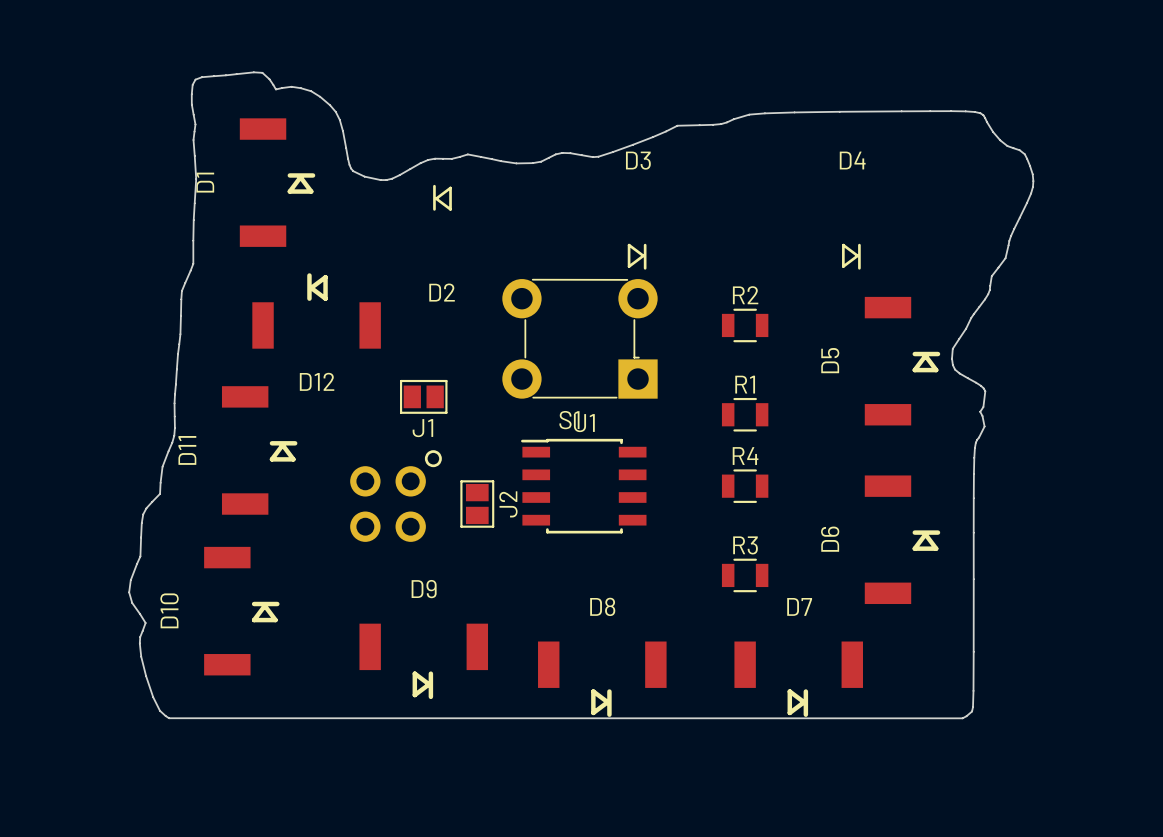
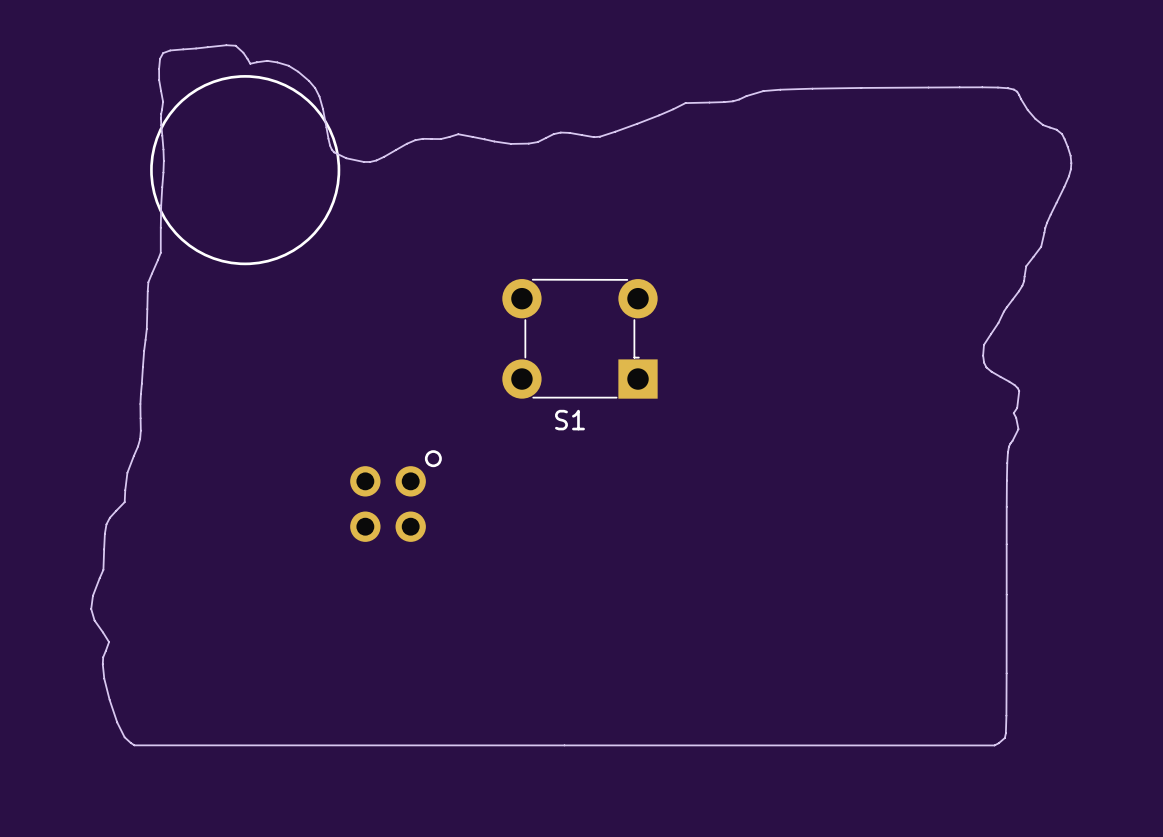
board edge: (253, 72) (262, 72) (275, 89) (291, 86) (300, 88) (320, 96) (330, 105) (339, 119) (351, 168) (364, 176) (380, 180) (392, 178) (428, 159) (451, 158) (467, 154) (516, 163) (541, 161) (562, 152) (598, 156) (653, 137) (677, 125) (721, 124) (749, 114) (951, 111) (975, 112) (983, 115) (1000, 140) (1024, 154) (1033, 181) (1031, 193) (1011, 235) (1005, 258) (991, 276) (988, 294) (952, 348) (952, 358) (955, 369) (981, 385) (985, 391) (983, 407) (980, 411) (984, 426) (975, 442) (974, 457) (972, 711) (962, 718) (169, 718) (165, 716) (159, 710) (153, 697) (146, 676) (139, 643) (145, 622) (132, 603) (129, 592) (130, 580) (140, 556) (143, 514) (160, 493) (162, 466) (174, 435) (181, 291) (193, 263) (196, 179) (193, 139) (195, 124) (191, 104) (192, 84) (195, 79) (202, 77) (253, 72) -> (226, 45) (170, 50) (163, 53) (160, 58) (159, 80) (163, 101) (160, 118) (163, 160) (160, 252) (148, 282) (146, 329) (140, 394) (140, 439) (127, 472) (124, 502) (109, 517) (106, 524) (103, 569) (92, 595) (91, 608) (94, 620) (109, 642) (102, 664) (109, 699) (117, 722) (124, 737) (130, 742) (134, 745) (994, 745) (1004, 738) (1007, 463) (1008, 446) (1018, 429) (1013, 413) (1017, 408) (1019, 390) (1014, 385) (986, 367) (983, 355) (983, 344) (1022, 285) (1026, 266) (1041, 246) (1047, 222) (1068, 176) (1071, 163) (1070, 155) (1062, 134) (1056, 129) (1043, 125) (1035, 118) (1017, 91) (1008, 88) (982, 87) (812, 88) (763, 91) (733, 101) (685, 103) (659, 115) (600, 136) (560, 132) (537, 142) (511, 143) (458, 134) (440, 139) (415, 140) (376, 160) (363, 161) (346, 158) (331, 149) (319, 96) (309, 81) (298, 71) (288, 65) (277, 62) (267, 60) (250, 63) (243, 52) (235, 45) (226, 45)
part: none -> (245, 170)
D1: (277, 182) -> none
D2: (442, 197) -> none
D3: (637, 256) -> none
D4: (851, 256) -> none
D12: (316, 310) -> none
R2: (745, 325) -> none
D5: (902, 361) -> none
J1: (423, 396) -> none
R1: (745, 414) -> none
D11: (259, 450) -> none
U1: (583, 486) -> none
R4: (745, 486) -> none
J2: (477, 504) -> none
D6: (902, 539) -> none
R3: (745, 575) -> none
D10: (241, 611) -> none
D9: (423, 661) -> none
D8: (602, 679) -> none
D7: (798, 679) -> none

